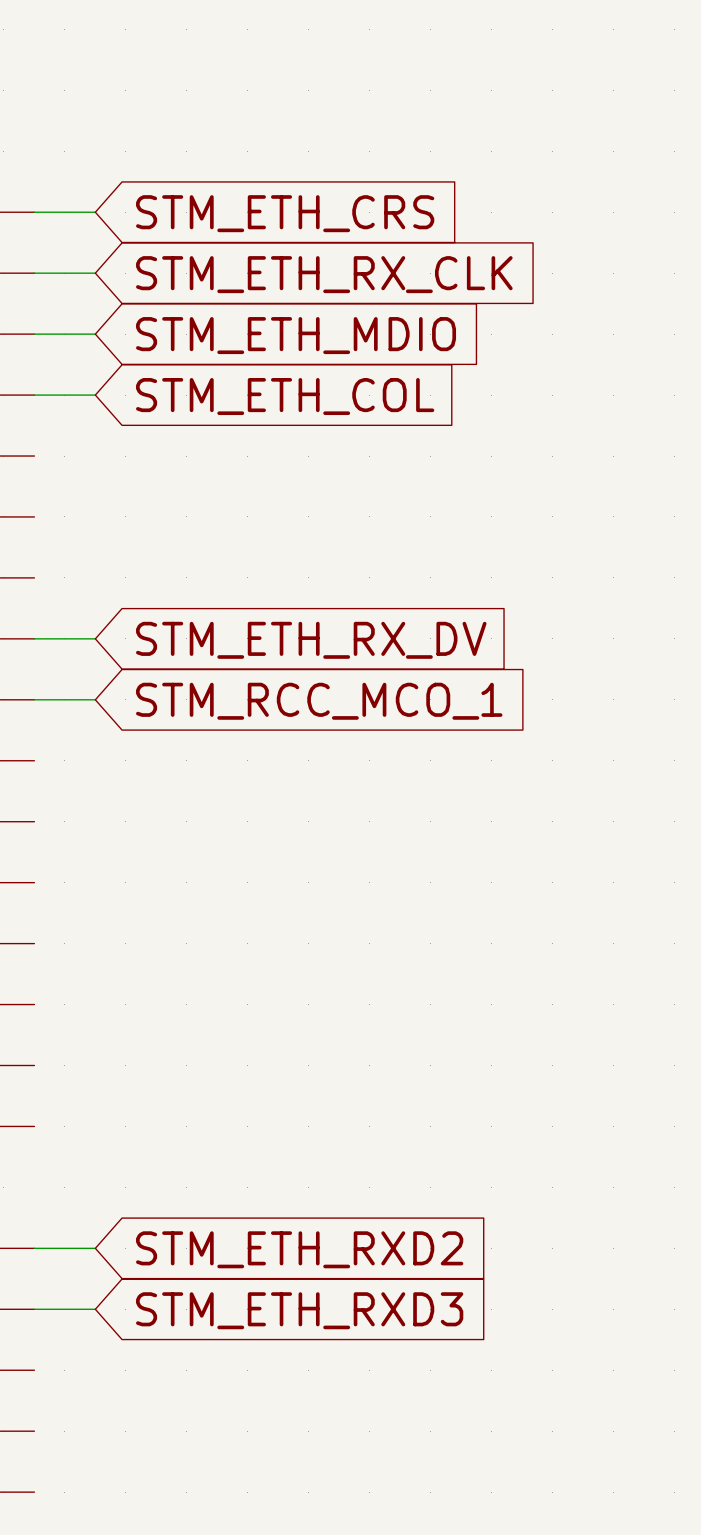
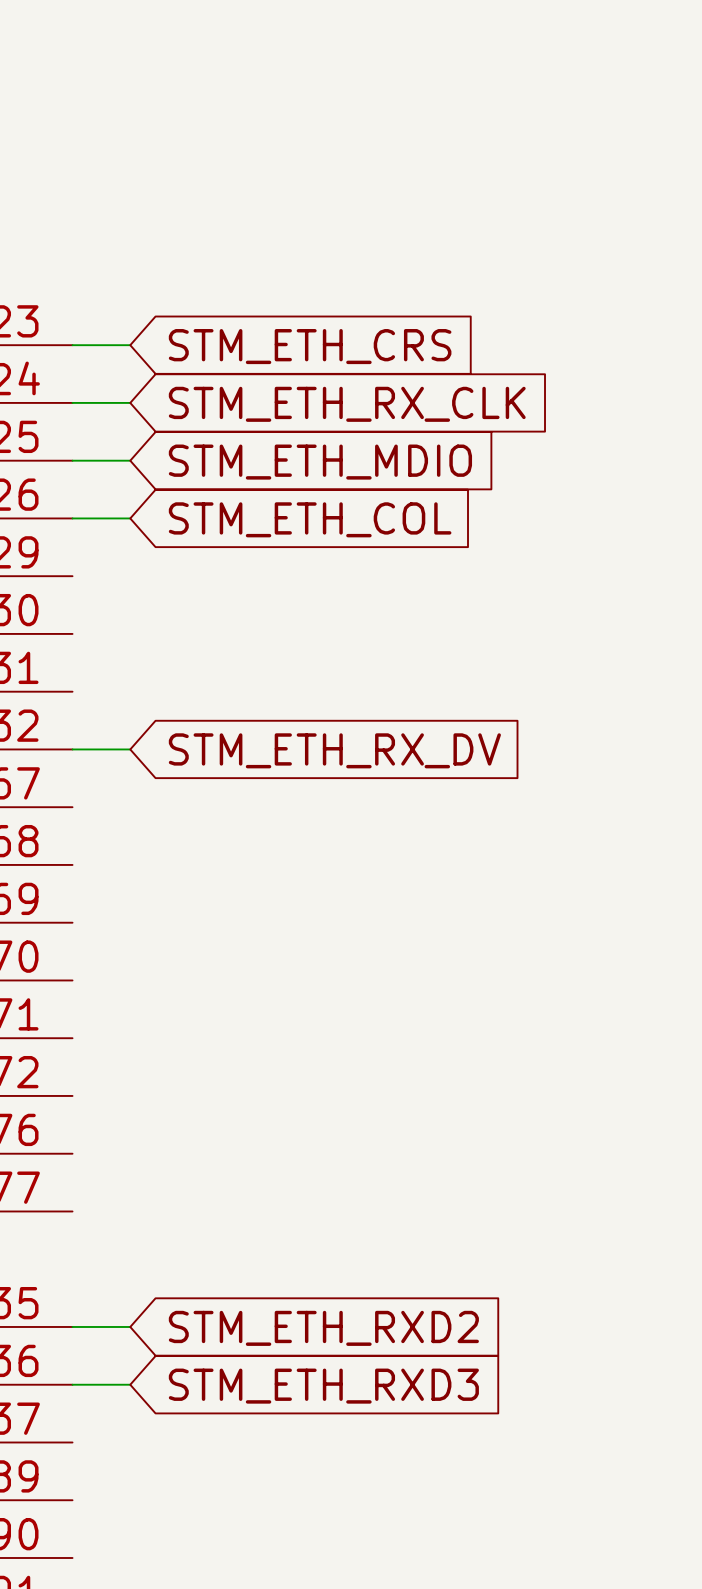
wire: (34, 699) (95, 699) -> none
global label: STM_RCC_MCO_1 (319, 701) -> none

